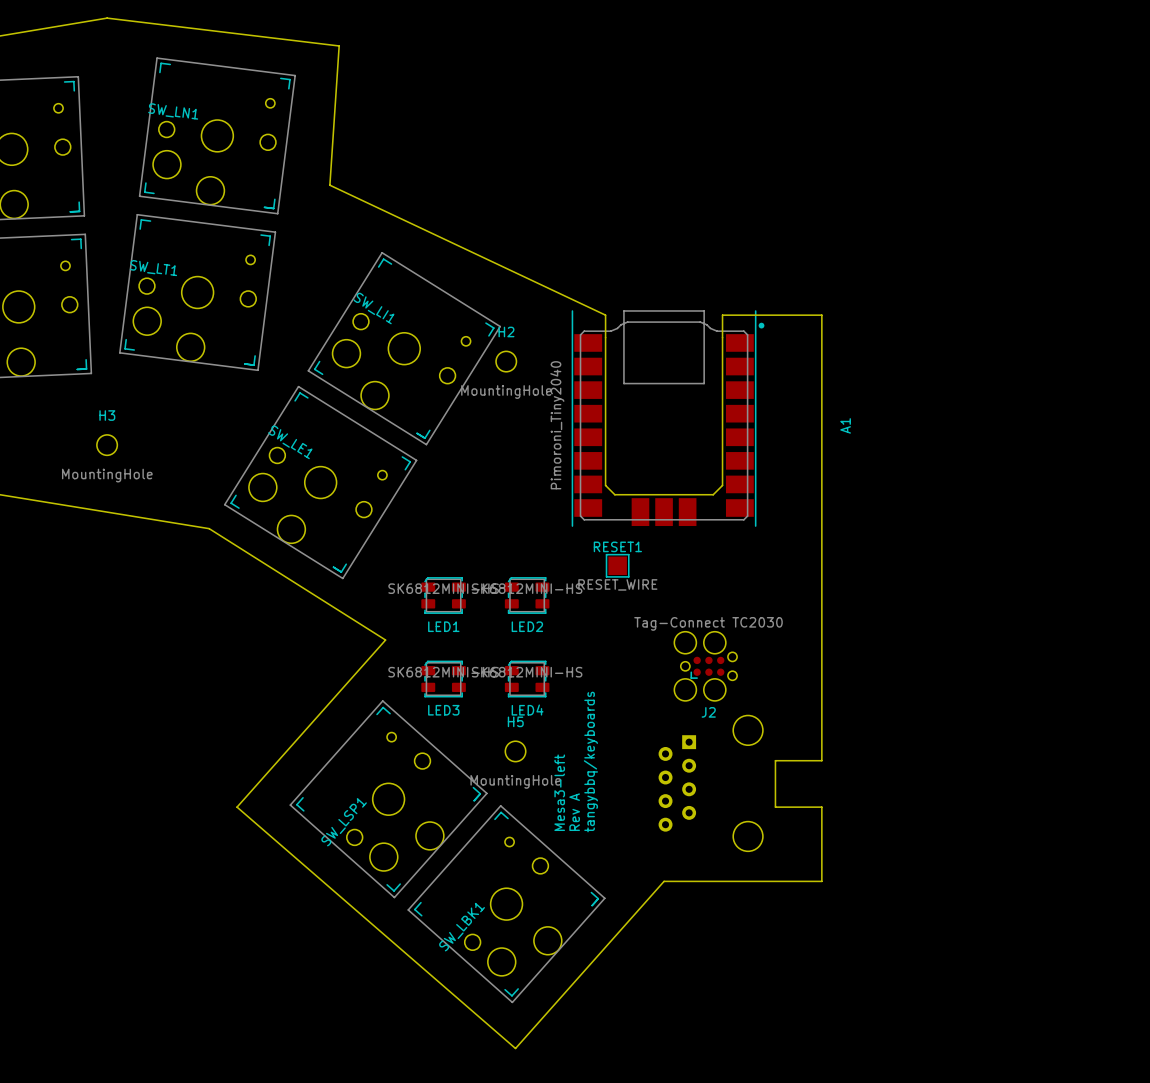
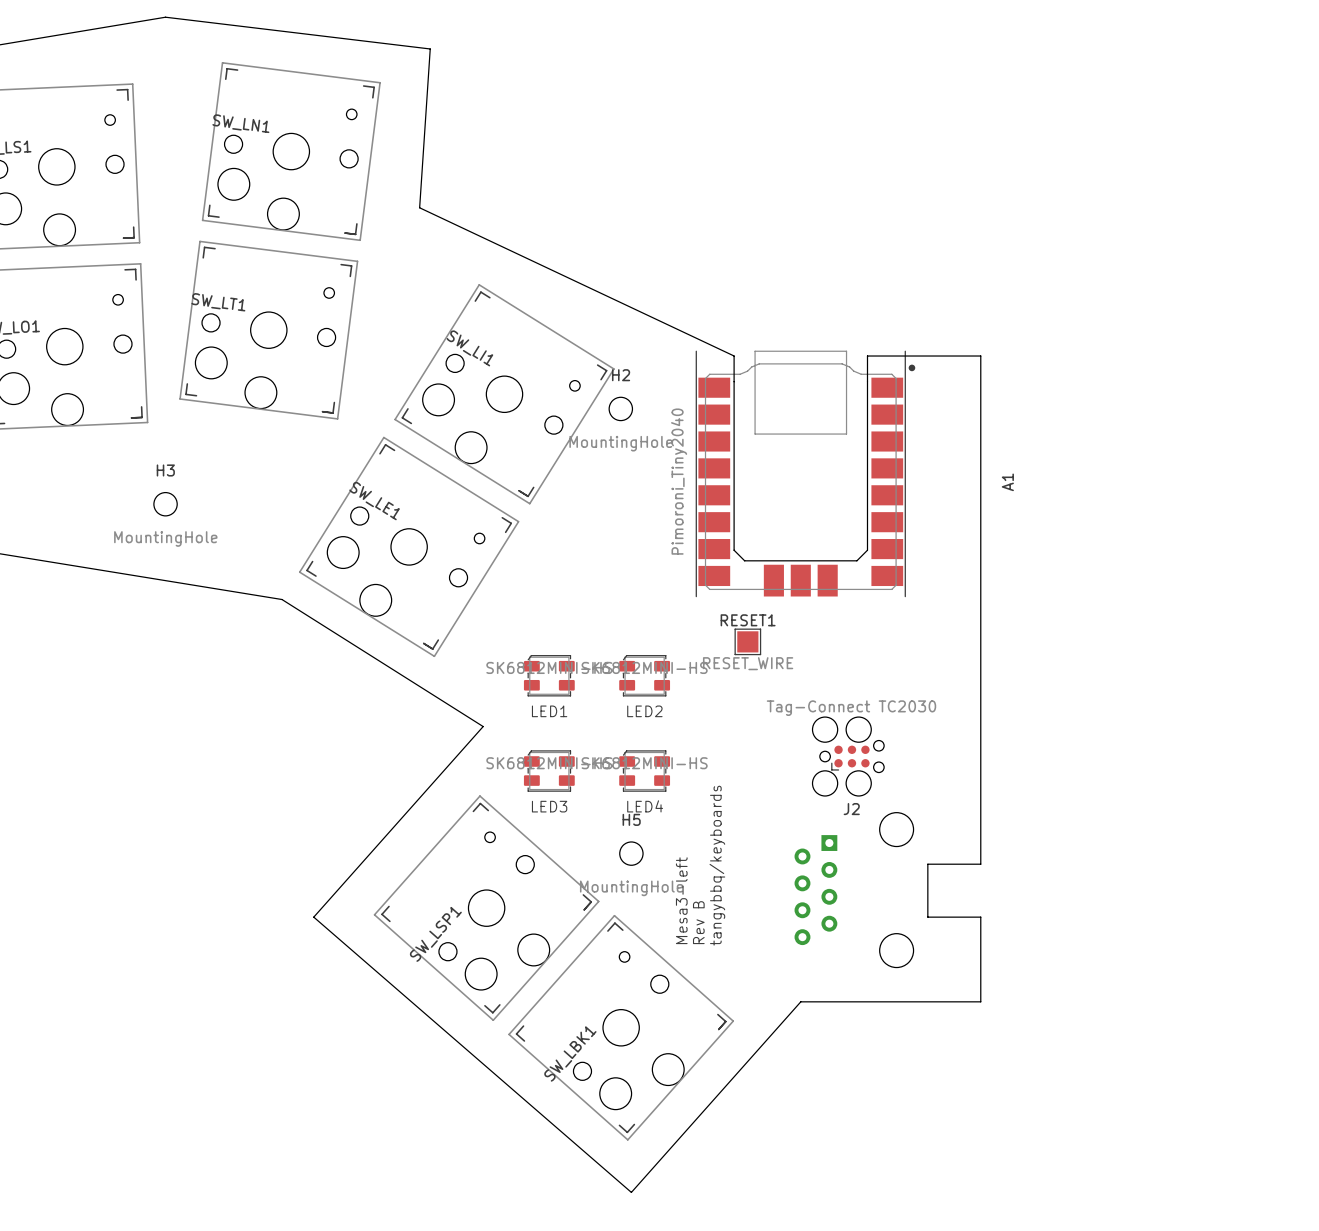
text: Rev A (574, 812) -> Rev B (698, 922)

